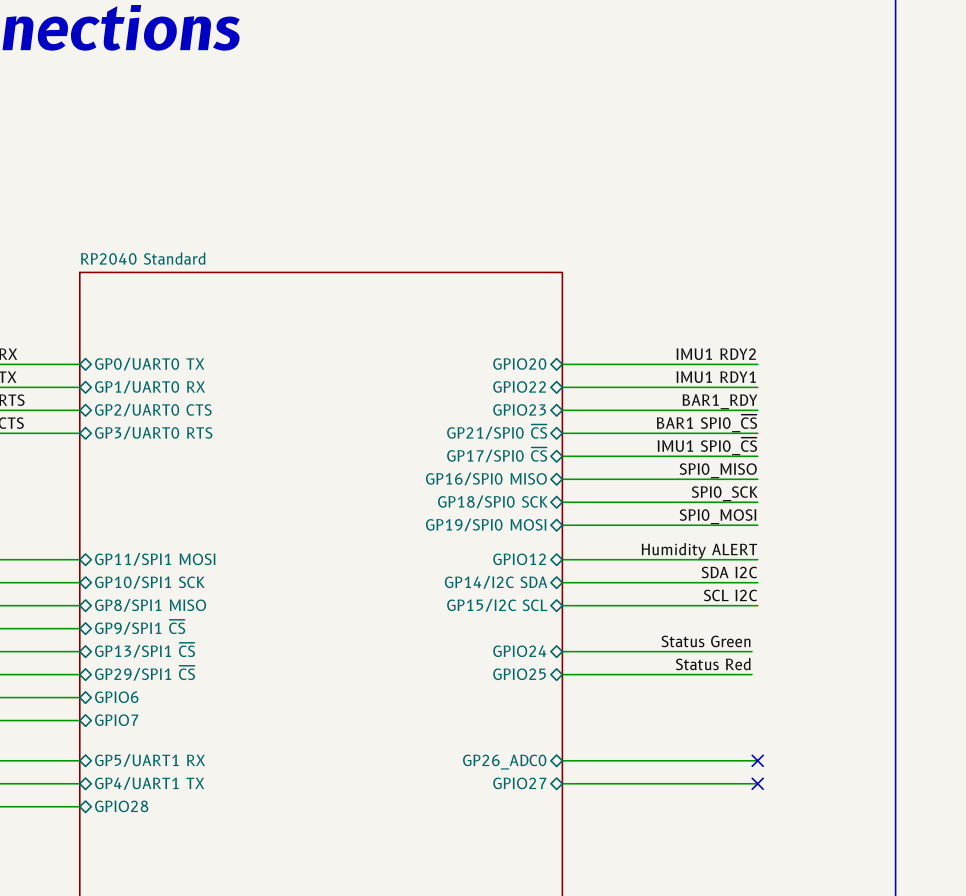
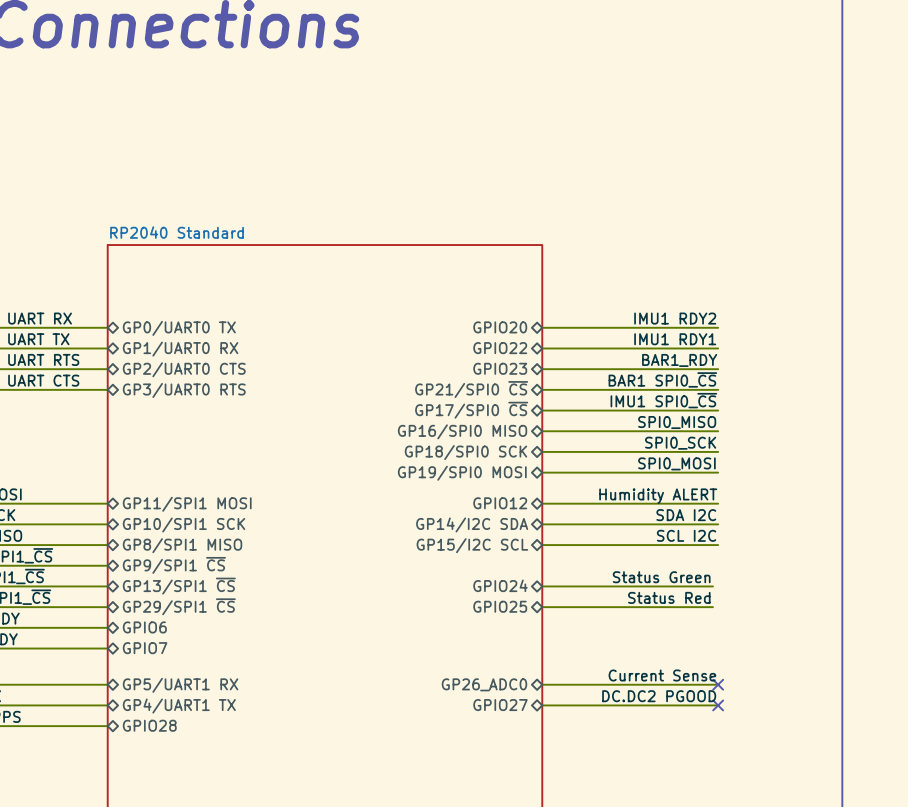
label: none -> Current Sense (662, 675)
label: none -> DC.DC2 PGOOD (659, 696)

